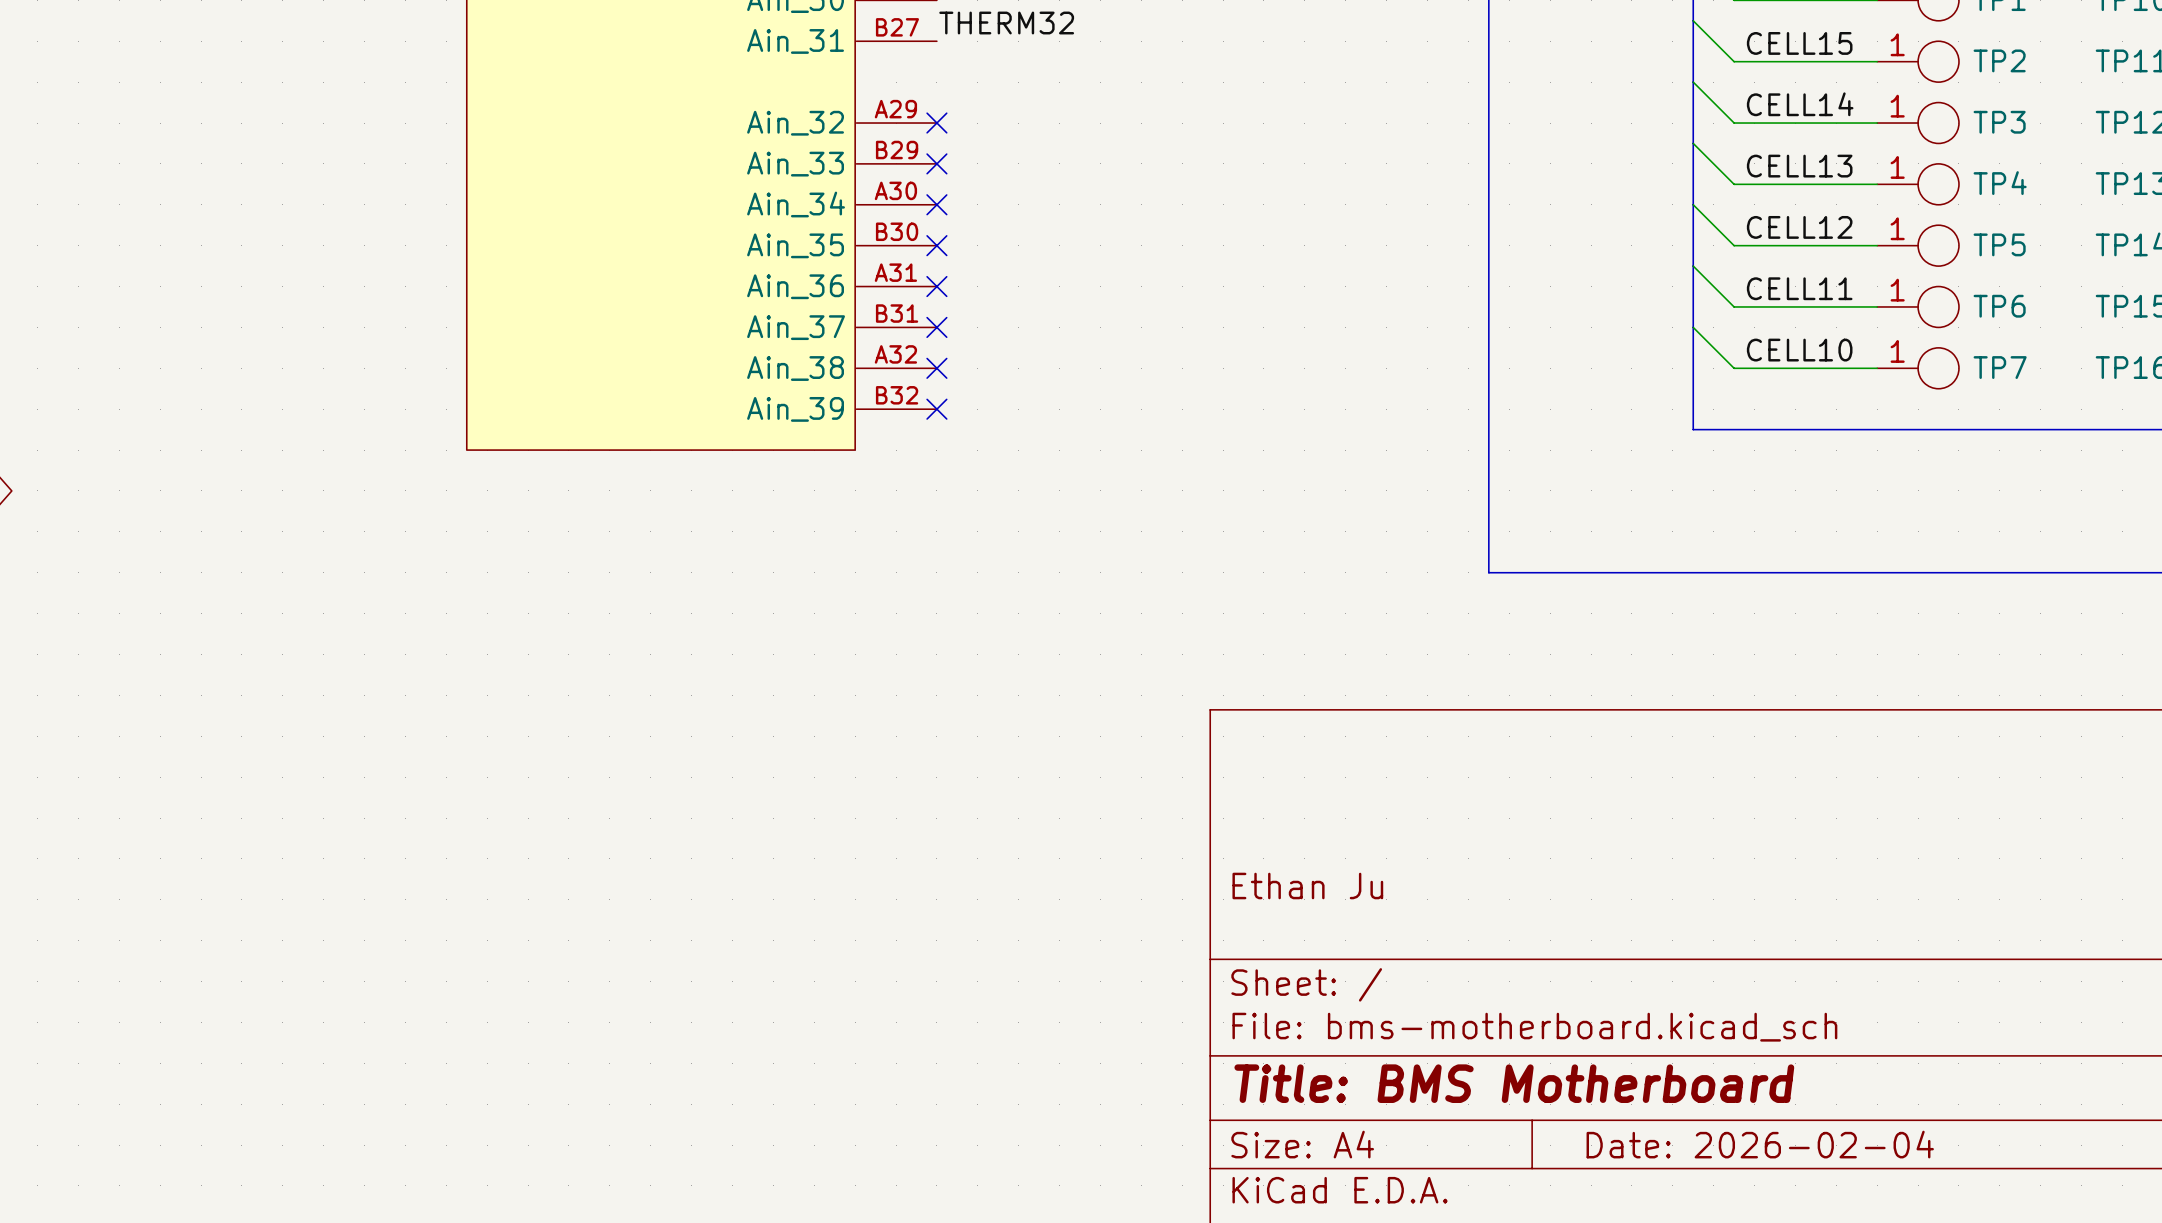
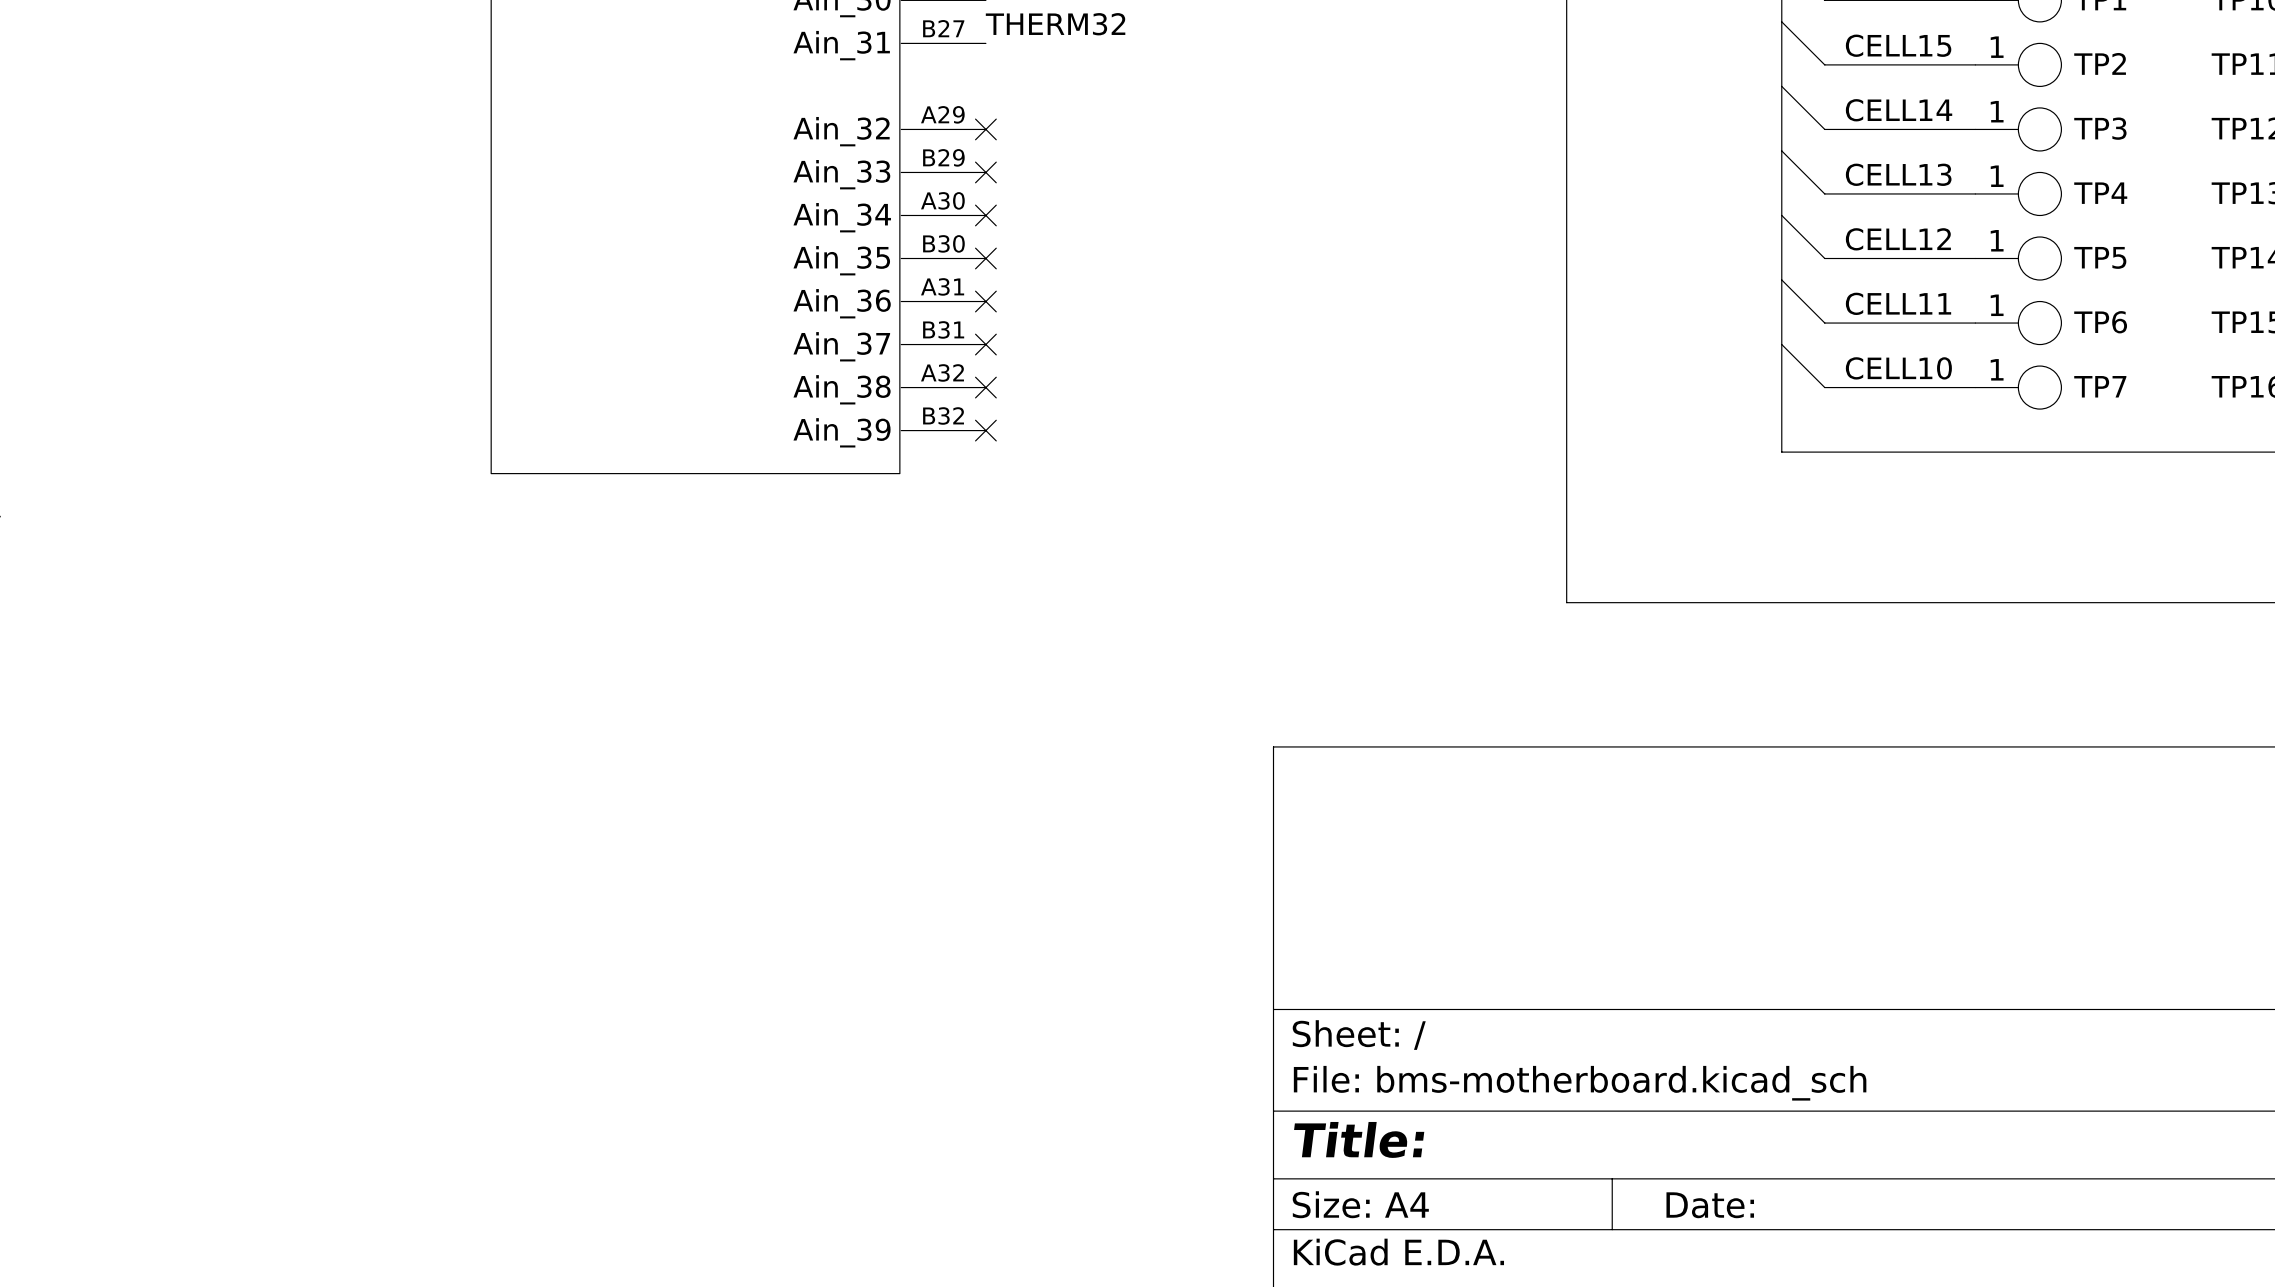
title block: Ethan Ju (1307, 886) -> none
title block: Title: BMS Motherboard (1514, 1083) -> Title: (1359, 1139)
title block: Date: 2026-02-04 (1760, 1144) -> Date: (1710, 1205)

